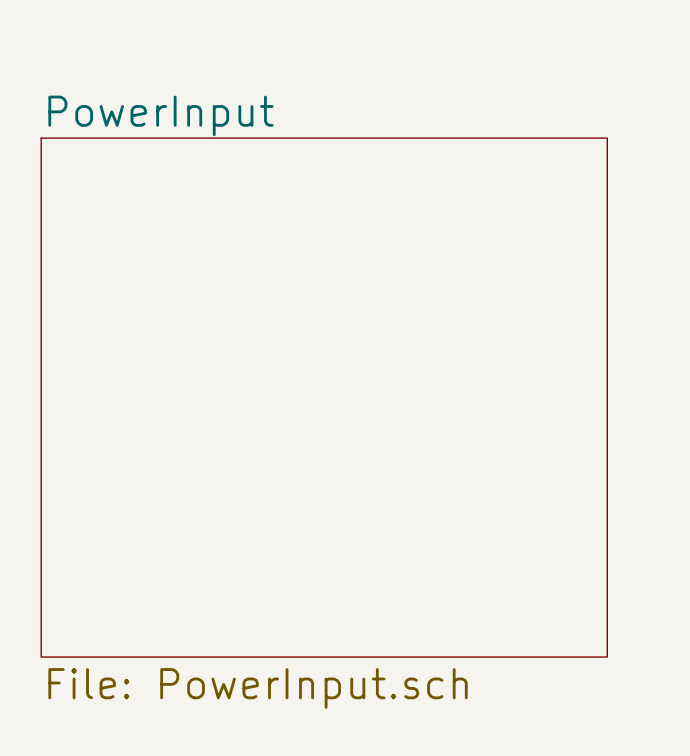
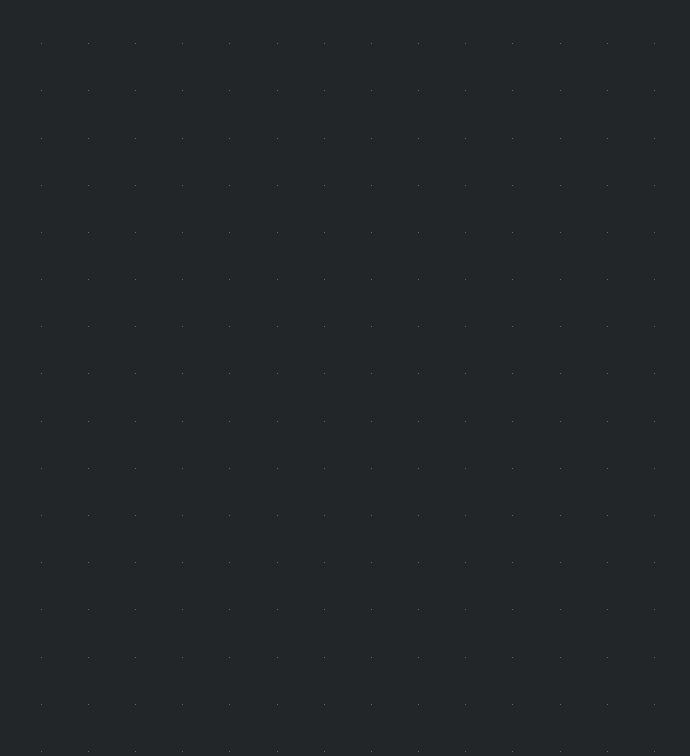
sheet PowerInput: File: PowerInput.sch (324, 397) -> none

